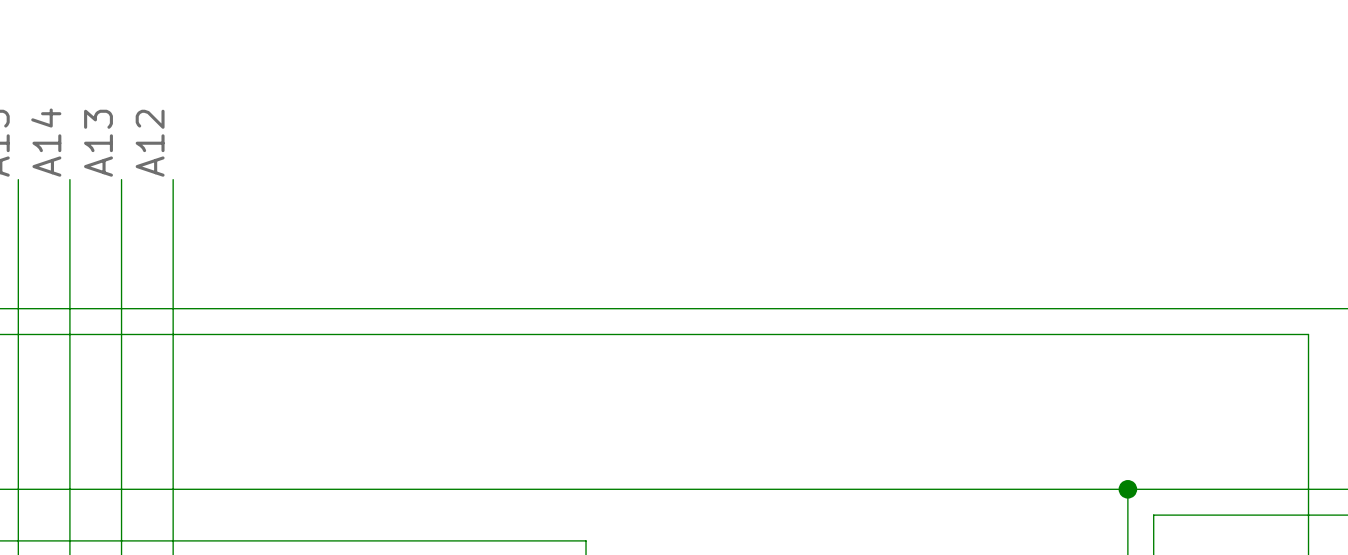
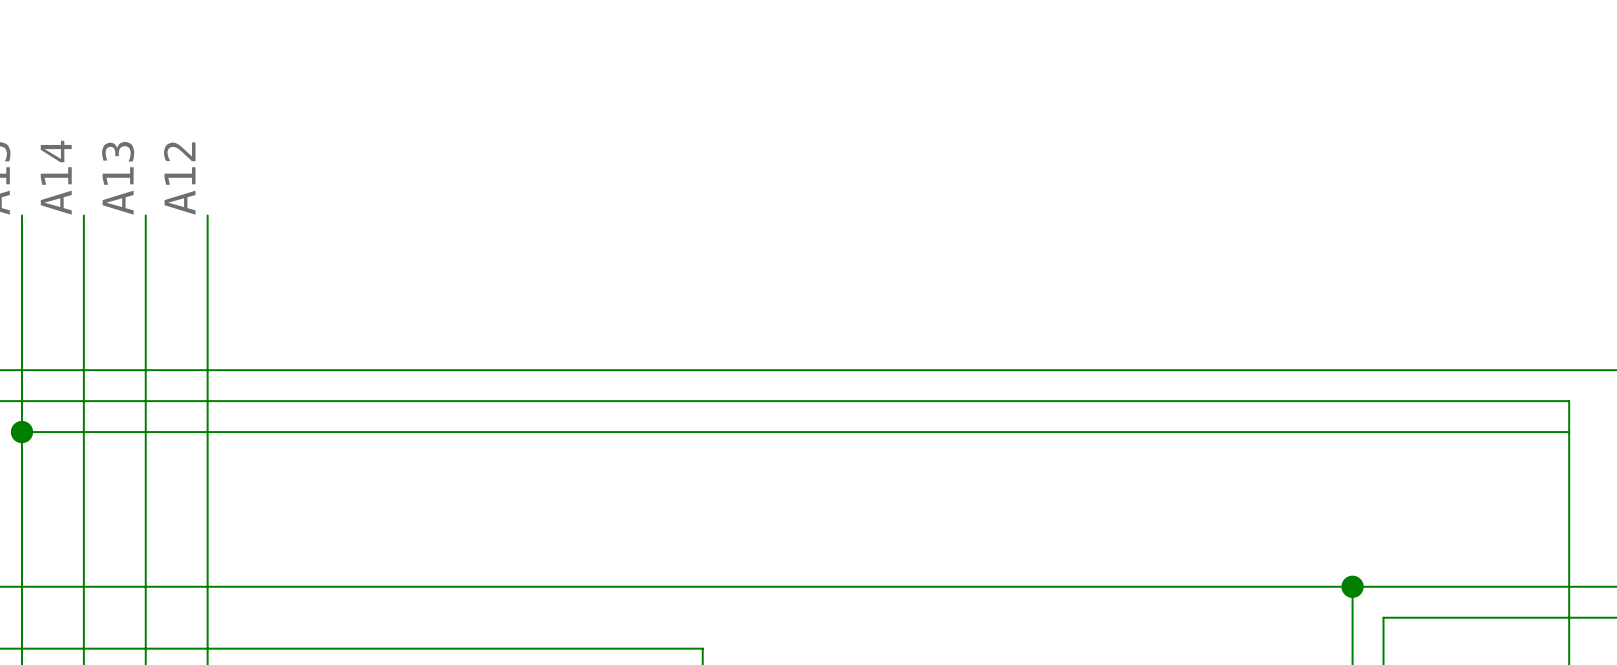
wire: none -> (21, 432) (1569, 432)
junction: none -> (21, 432)

